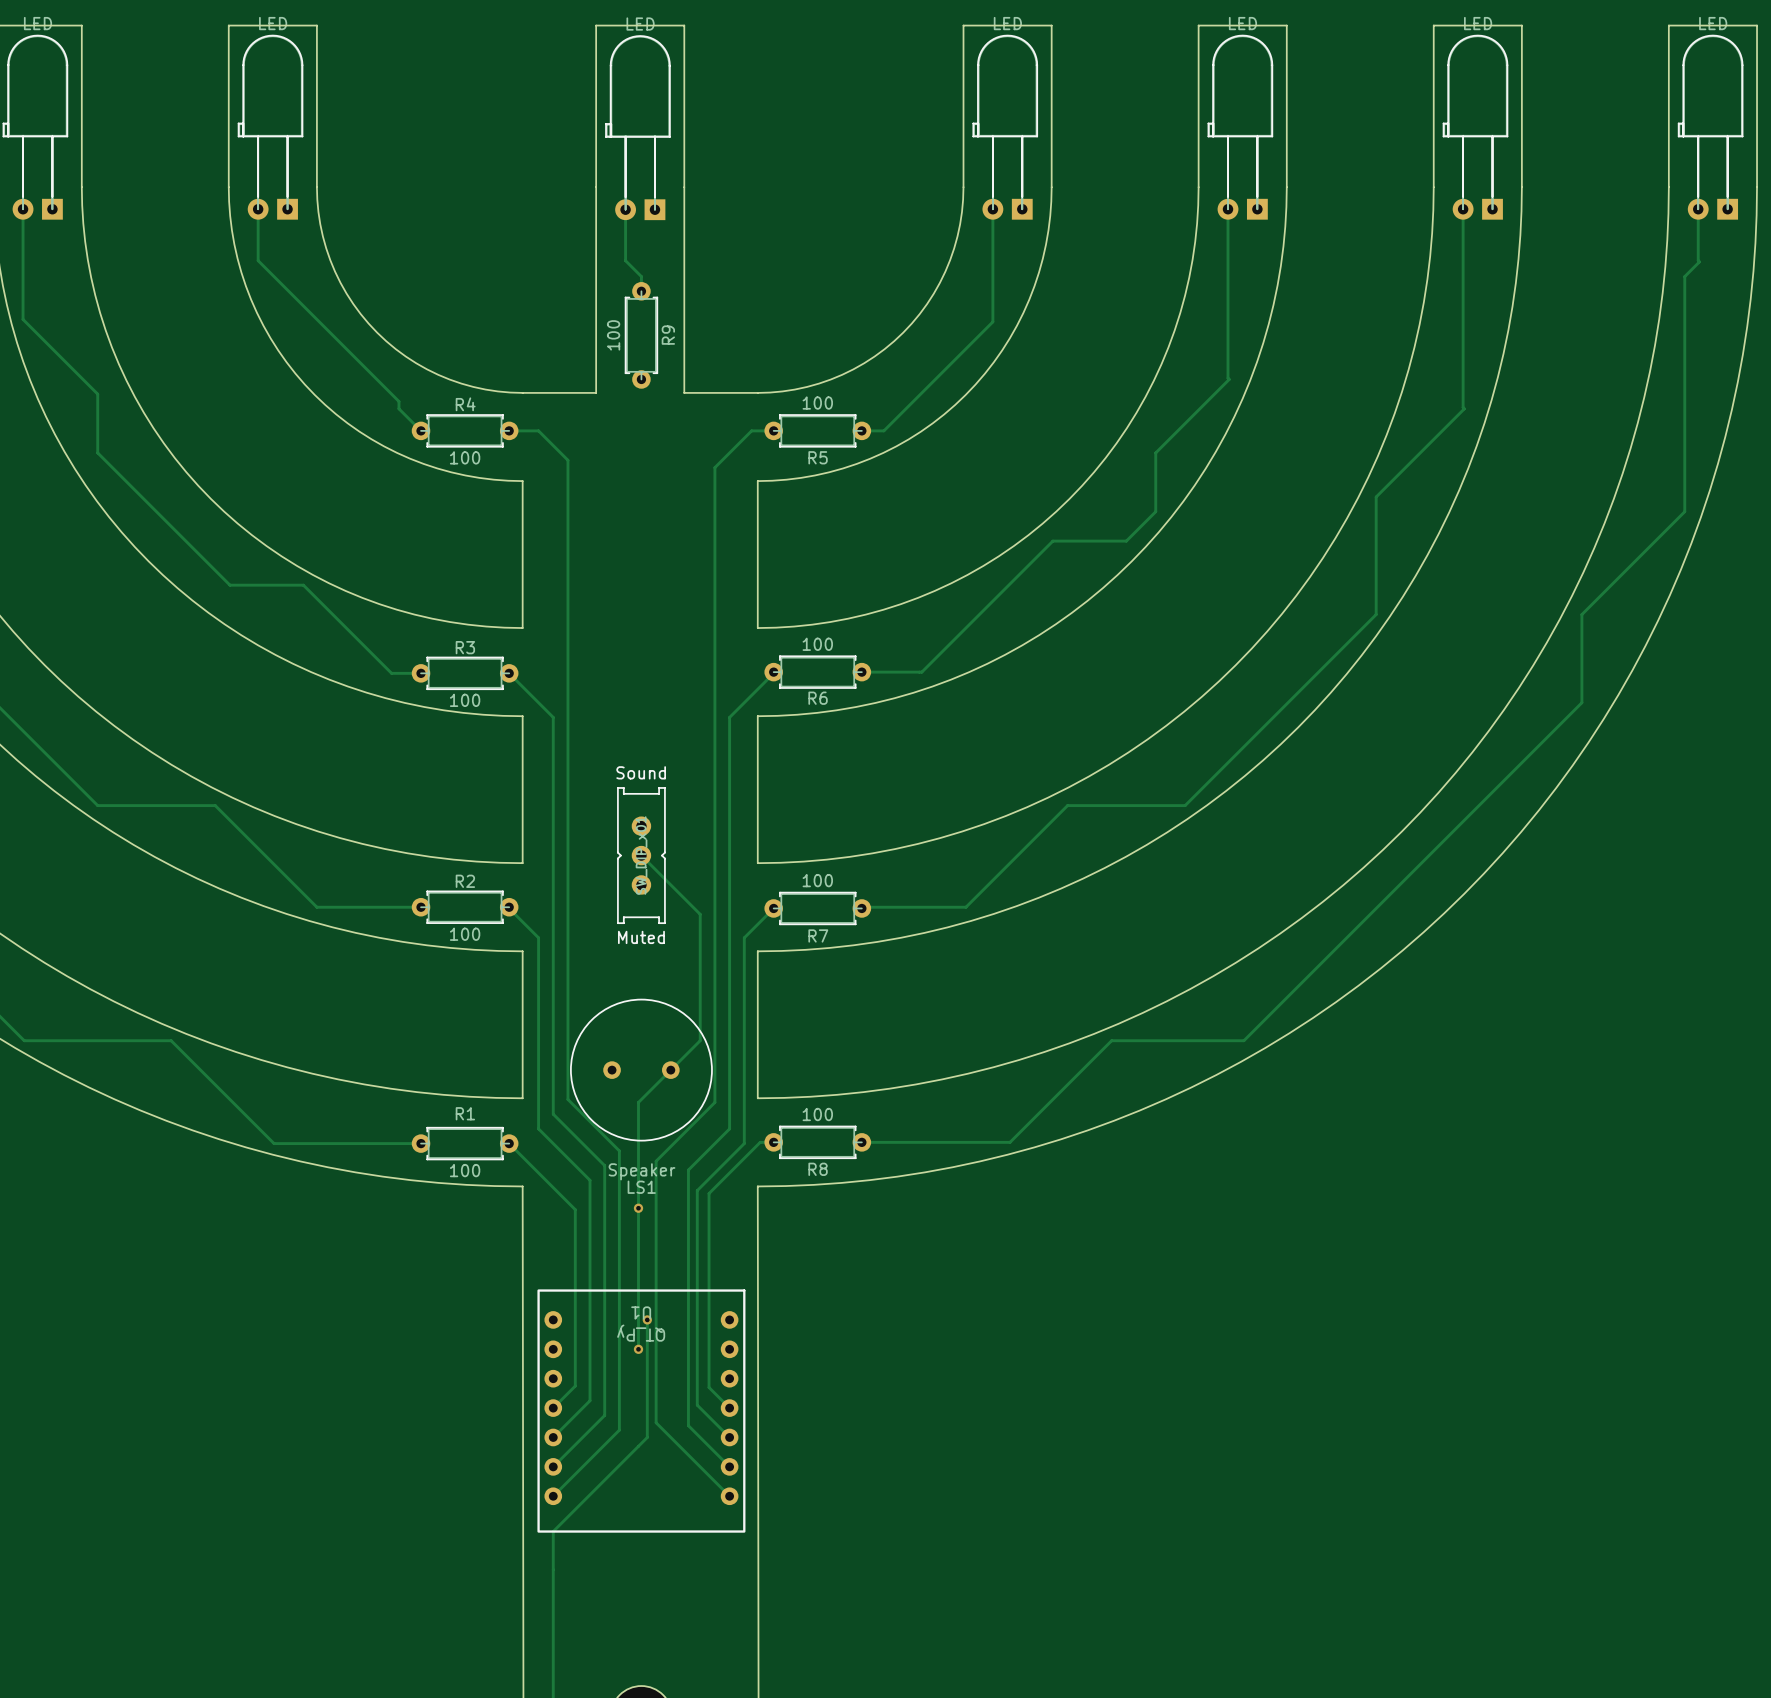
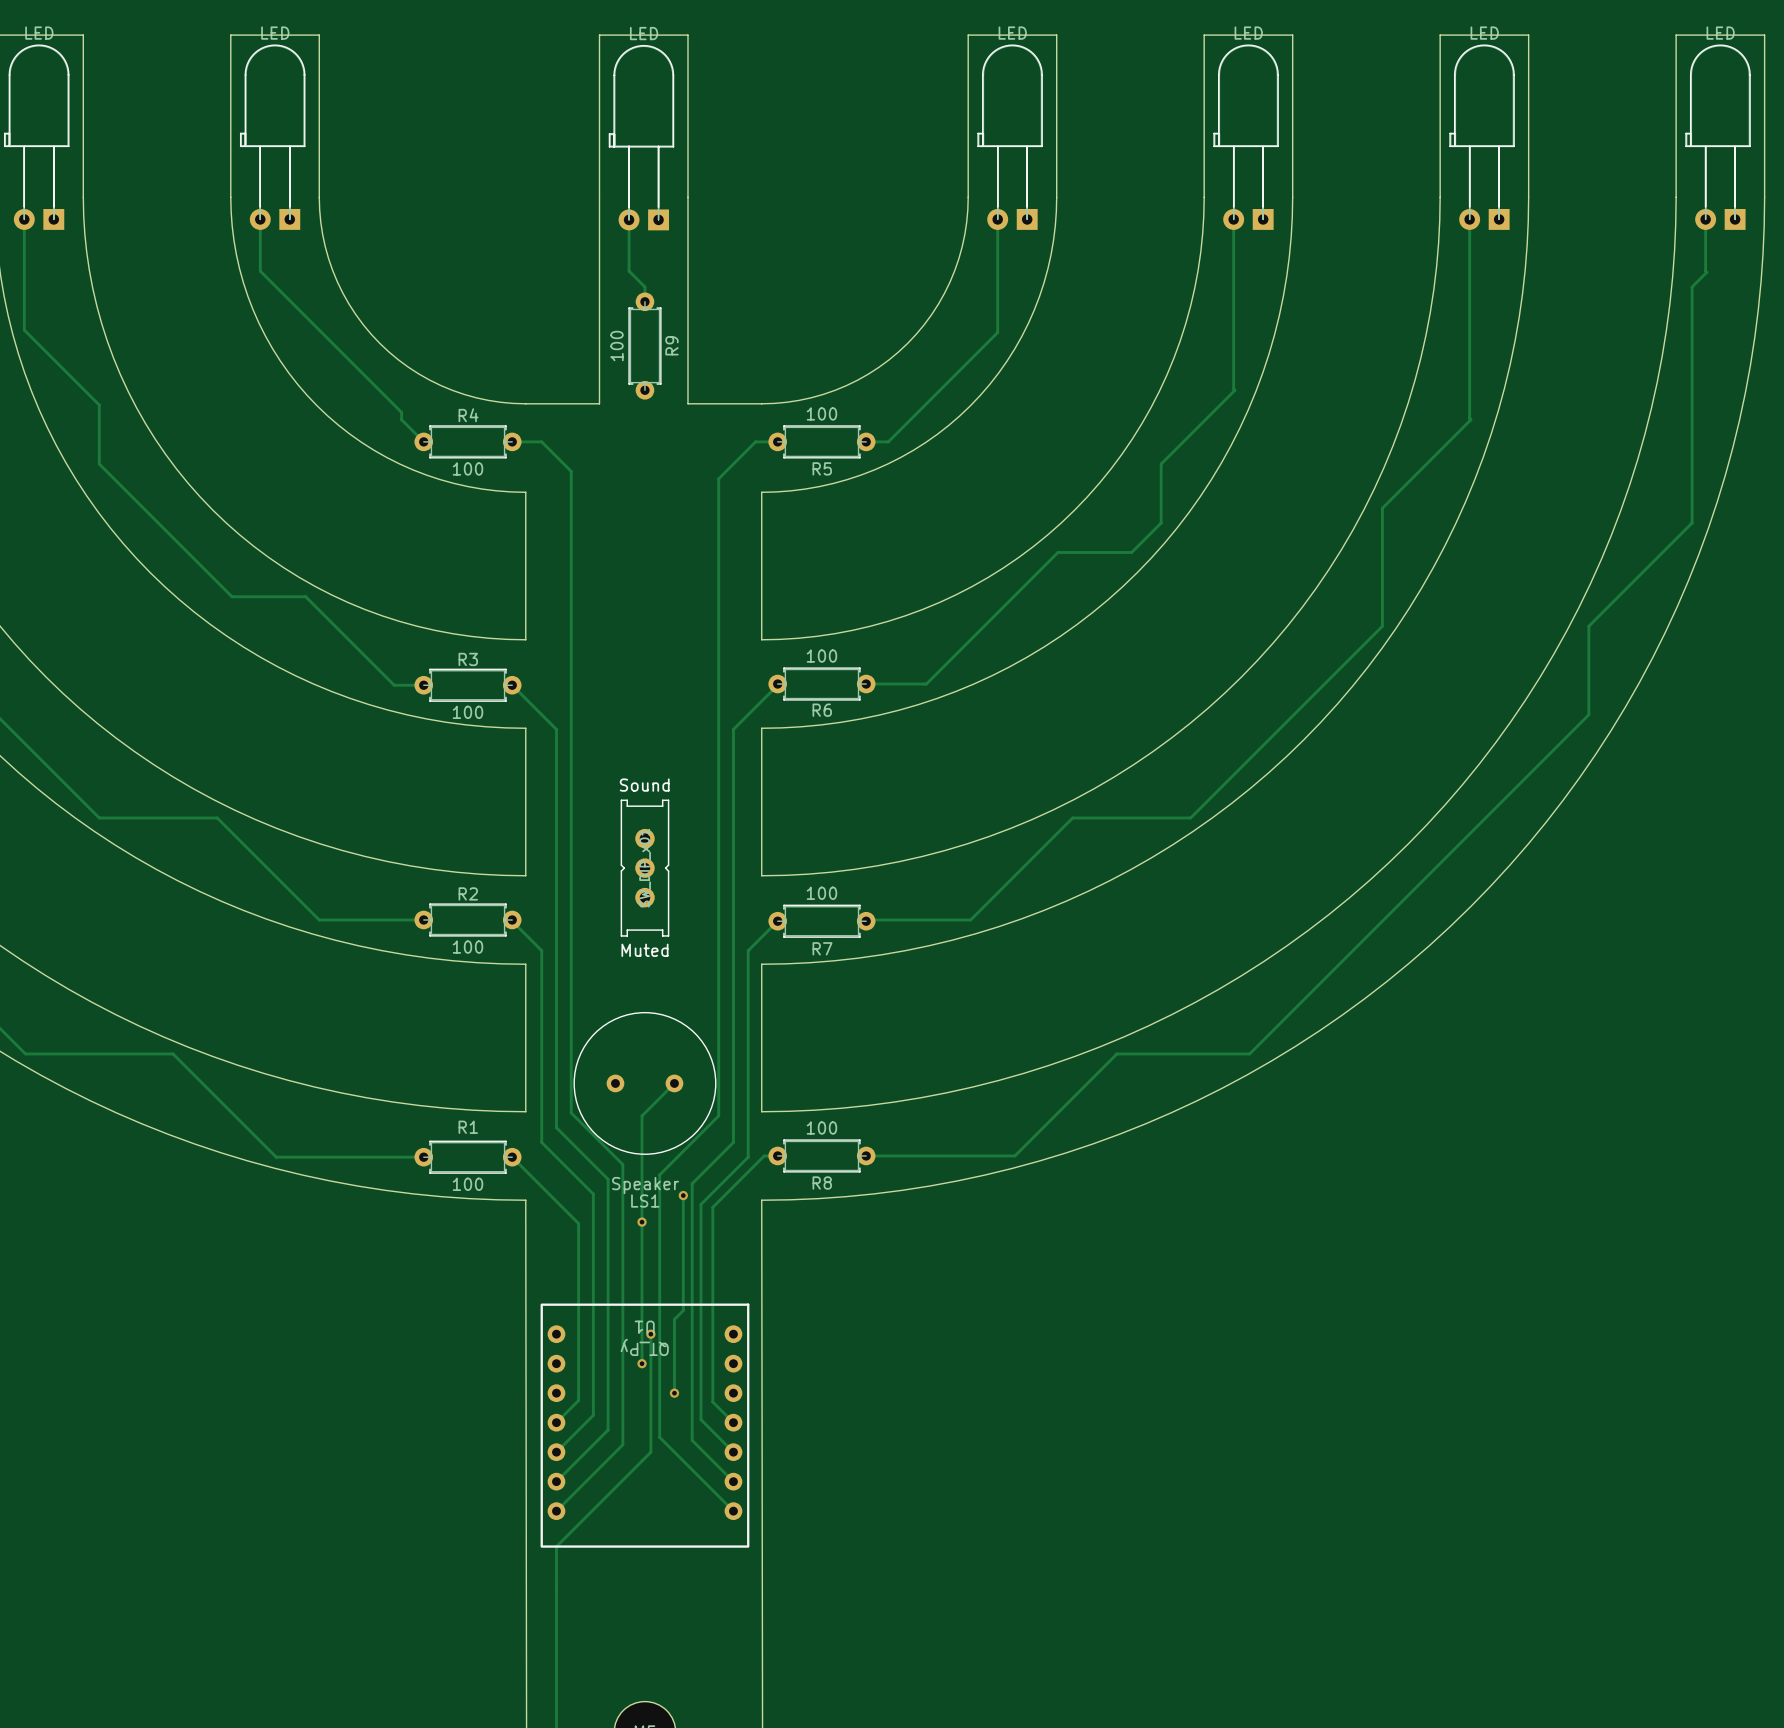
track: (641, 855) (700, 914) (700, 1040) (670, 1070) -> none
track: none -> (683, 1195) (683, 1310) (674, 1319) (674, 1393)
via: none -> (683, 1195)
via: none -> (674, 1393)

